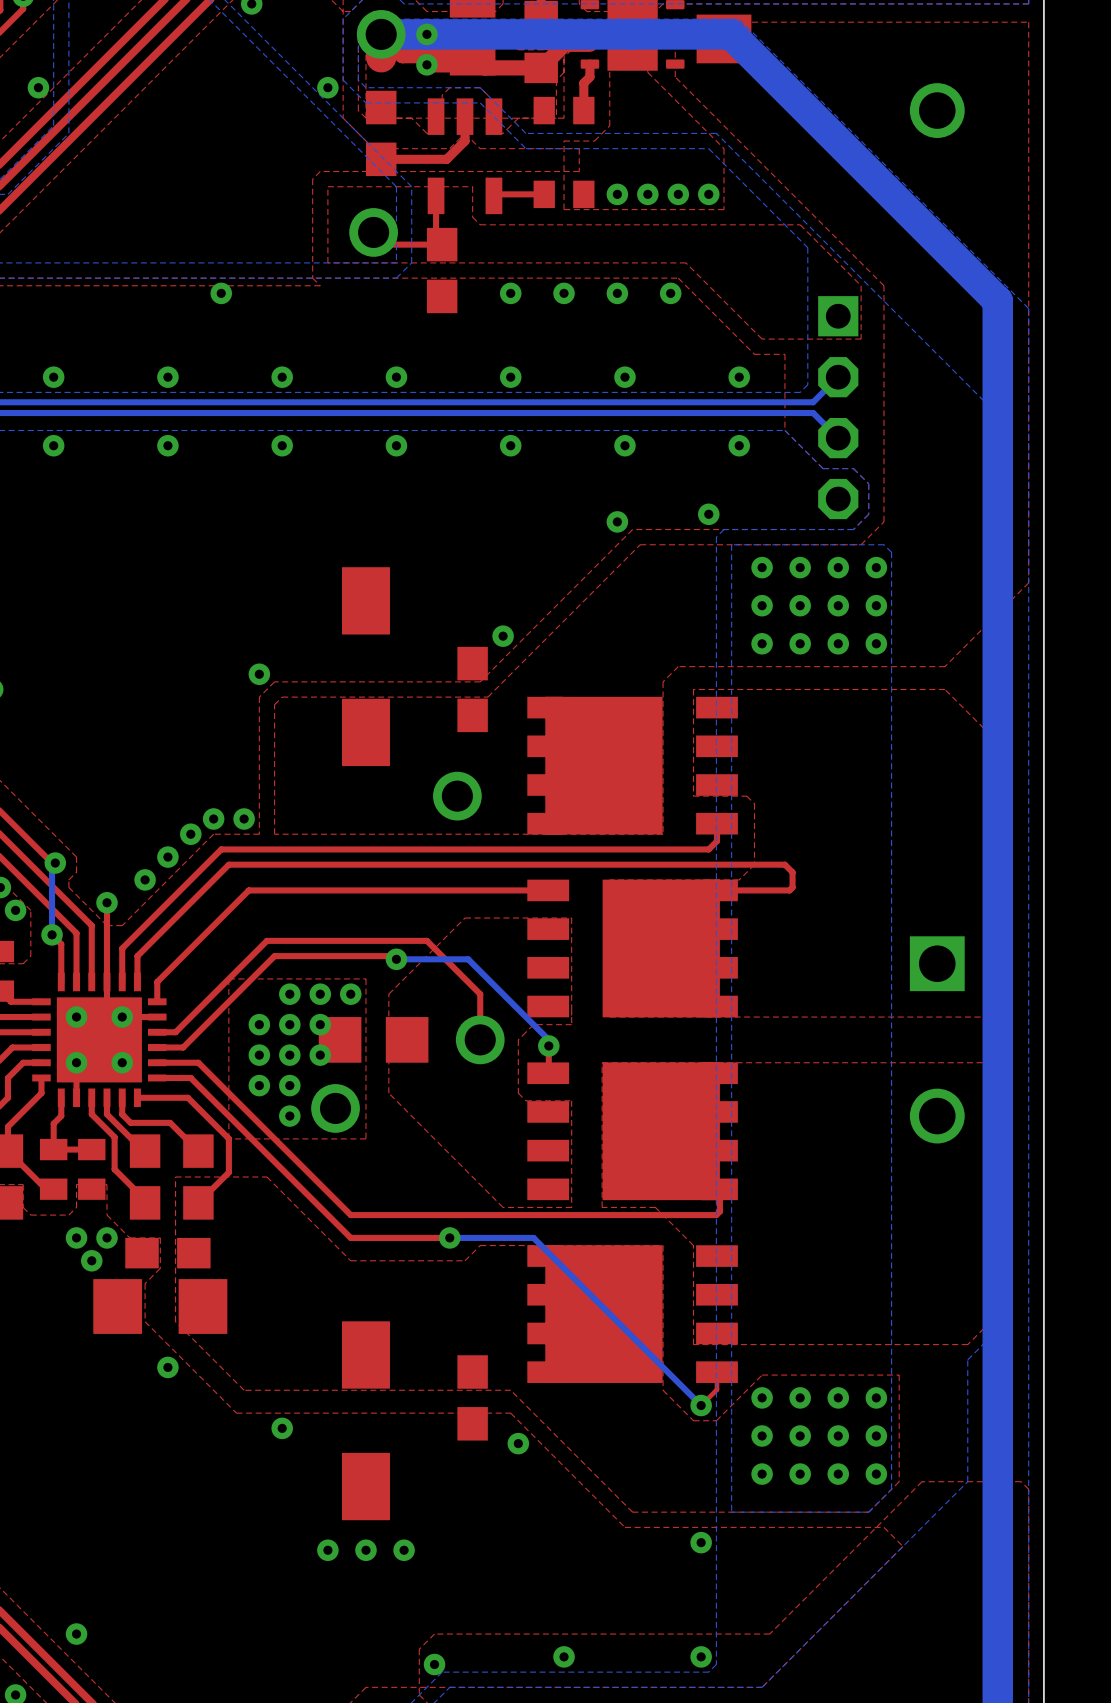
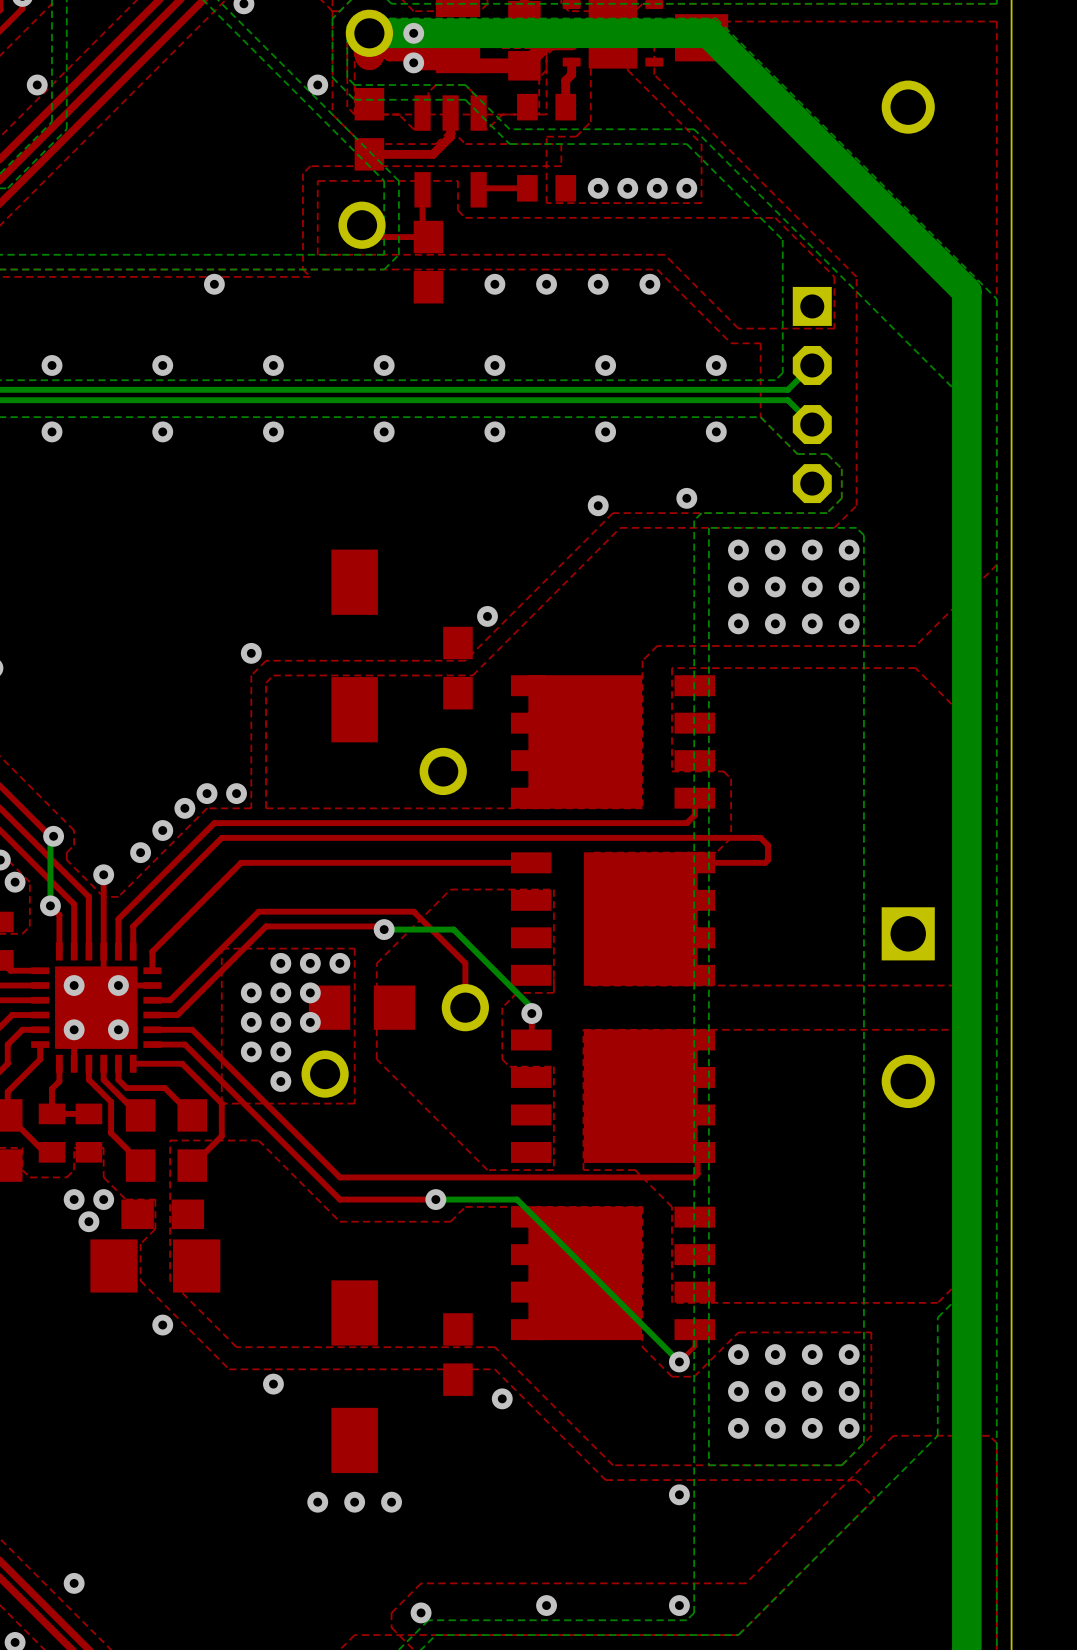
top zone outline: (419, 1649) (419, 1694) -> (406, 1598) (391, 1612) (391, 1627) (406, 1642)

